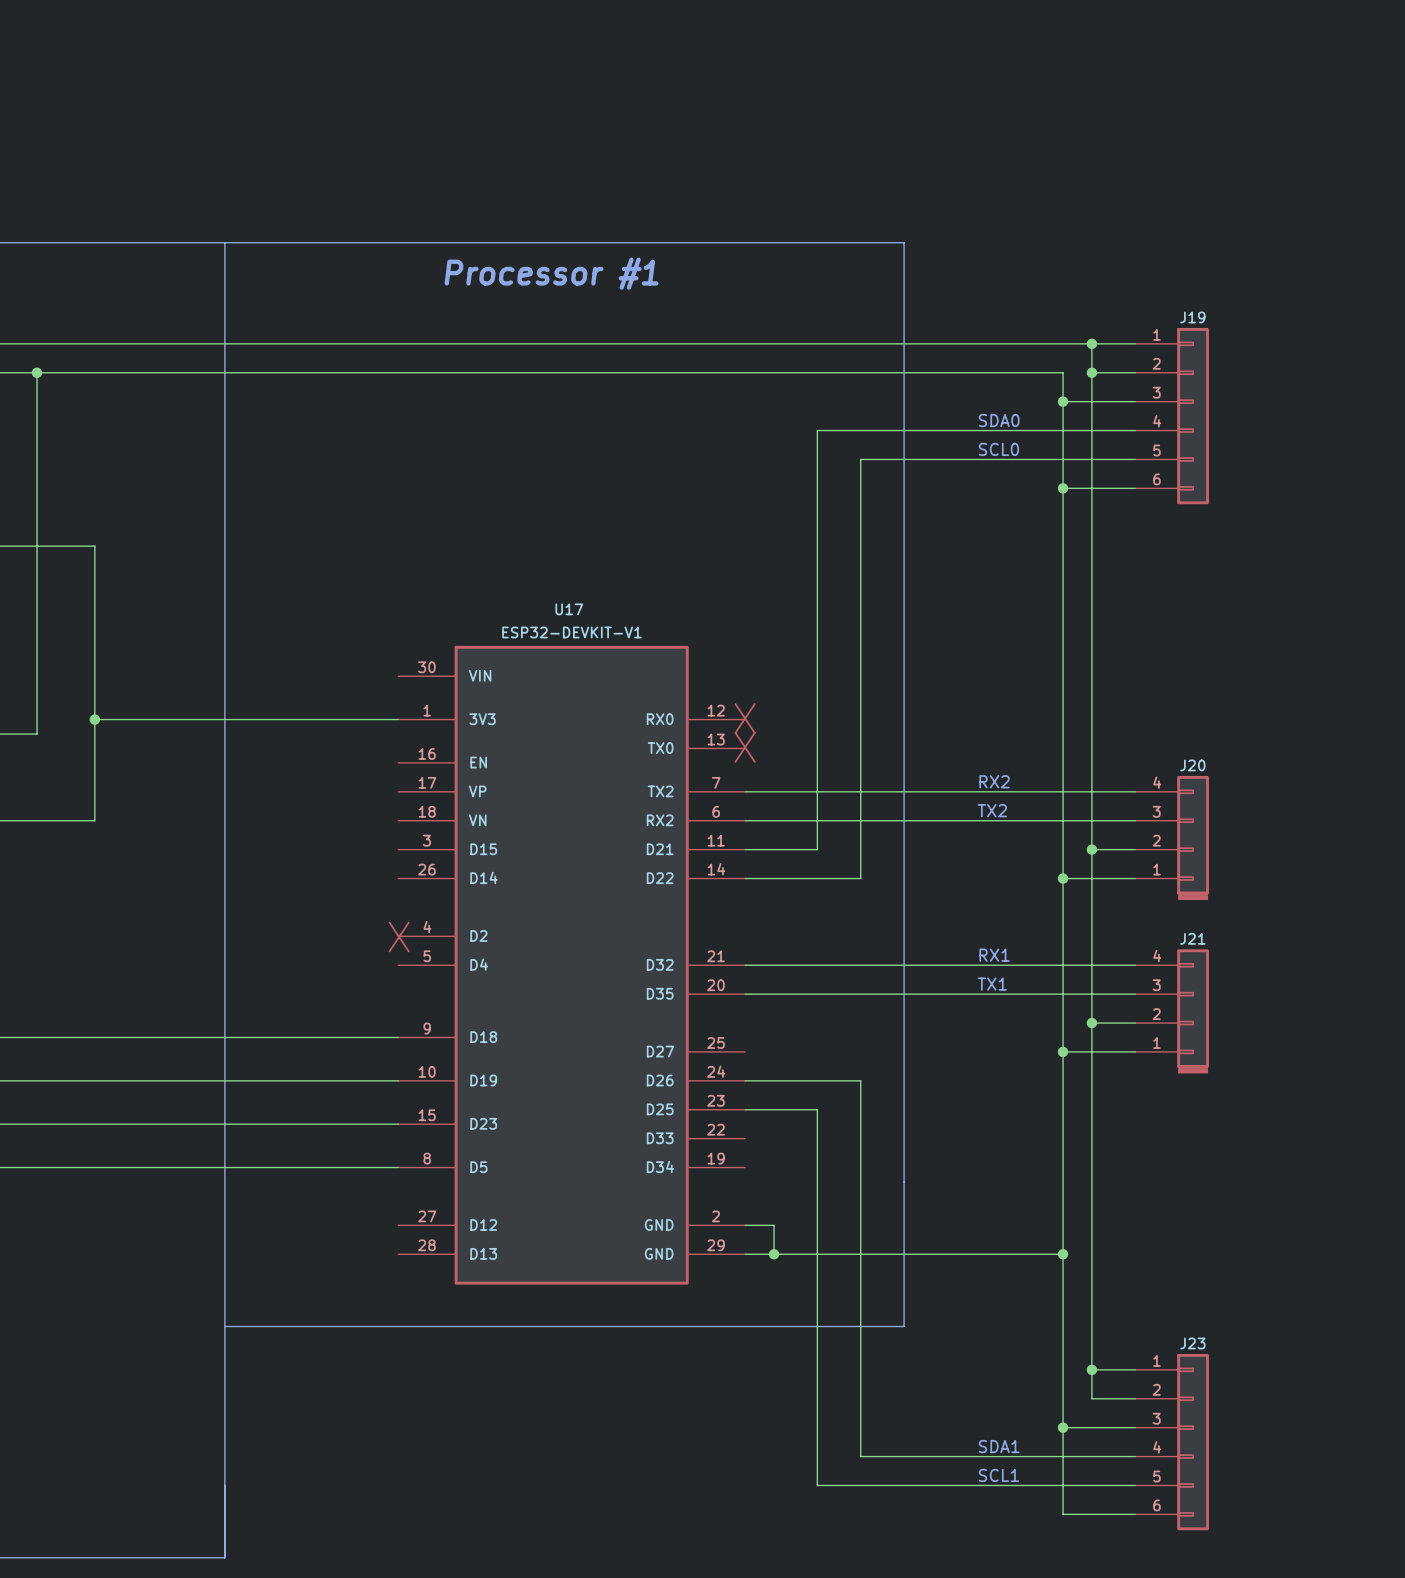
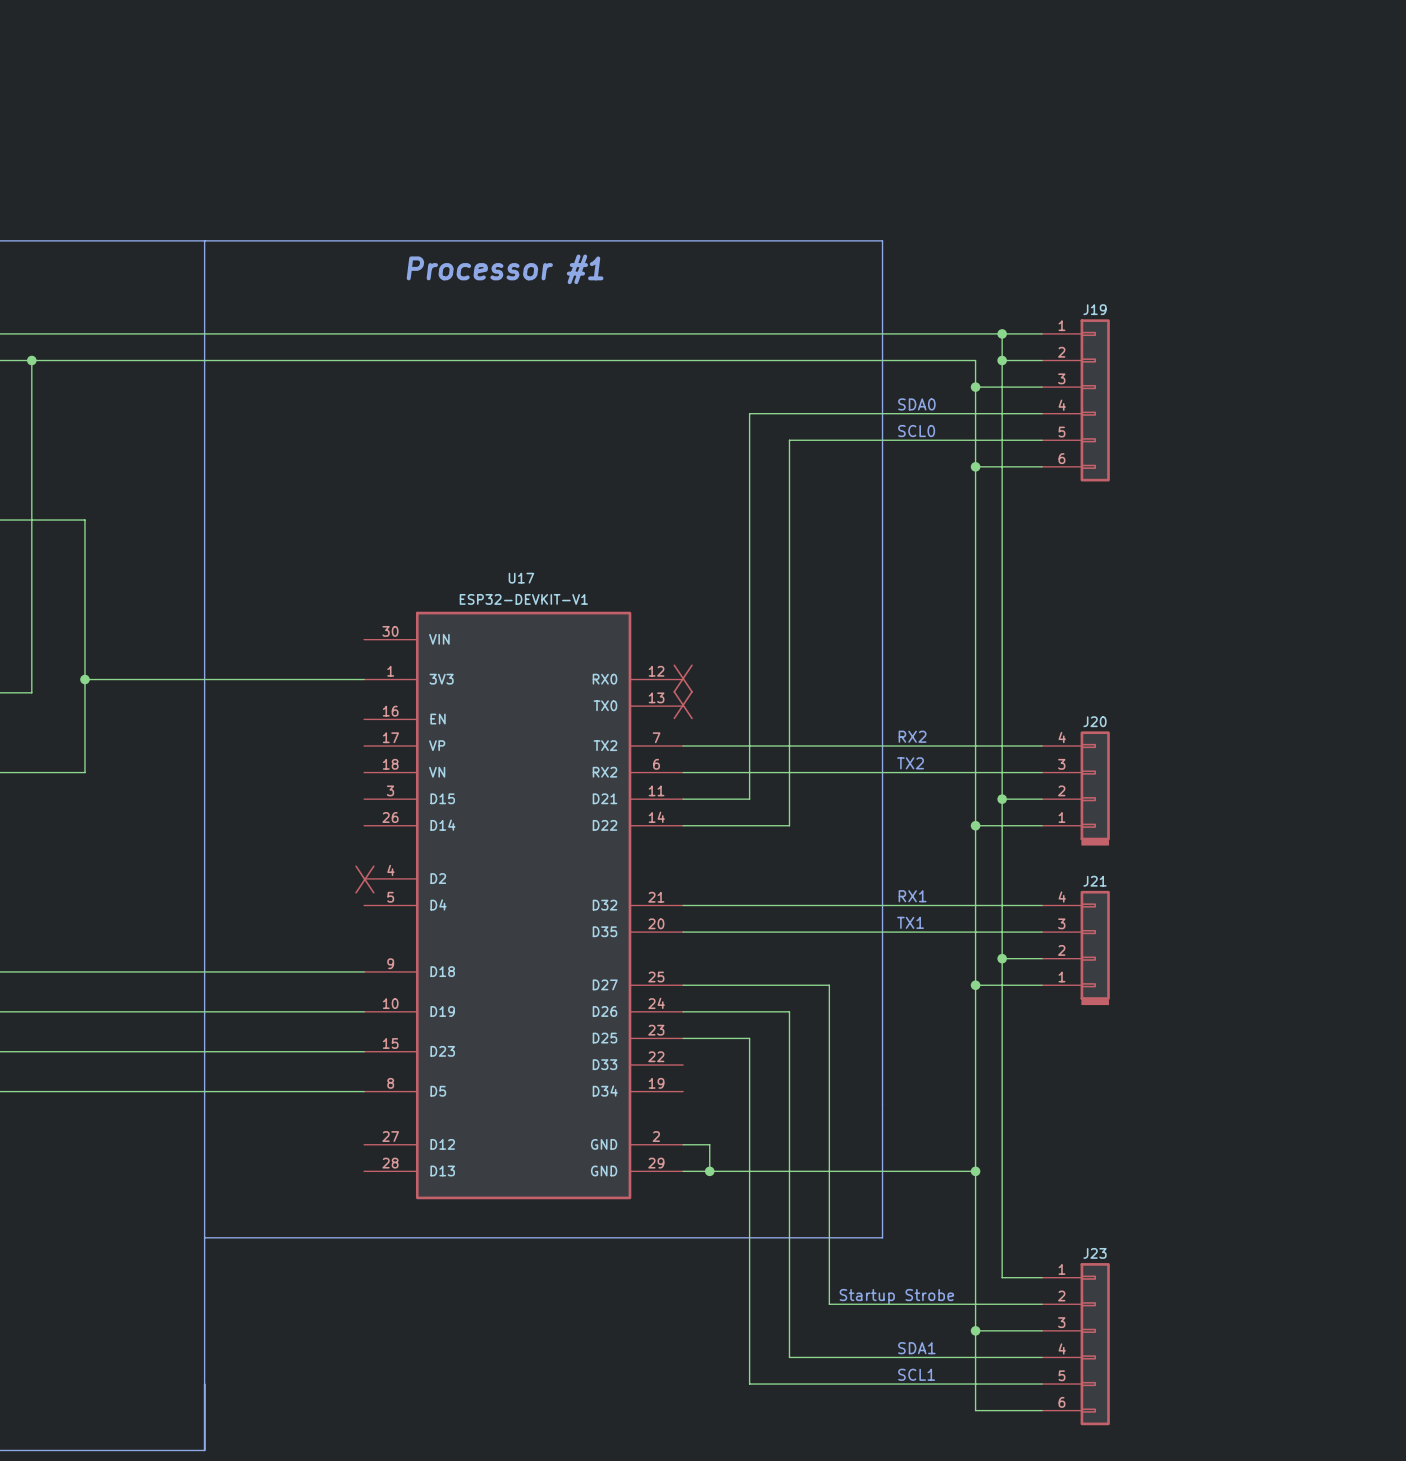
line: (904, 242) (904, 1326) -> (829, 240) (882, 240) (882, 1237) (829, 1237)
wire: (1091, 1369) (1091, 1398) -> (683, 985) (829, 985) (829, 1304) (1002, 1304)
junction: (1091, 1369) -> none
text: none -> Startup Strobe (896, 1296)

